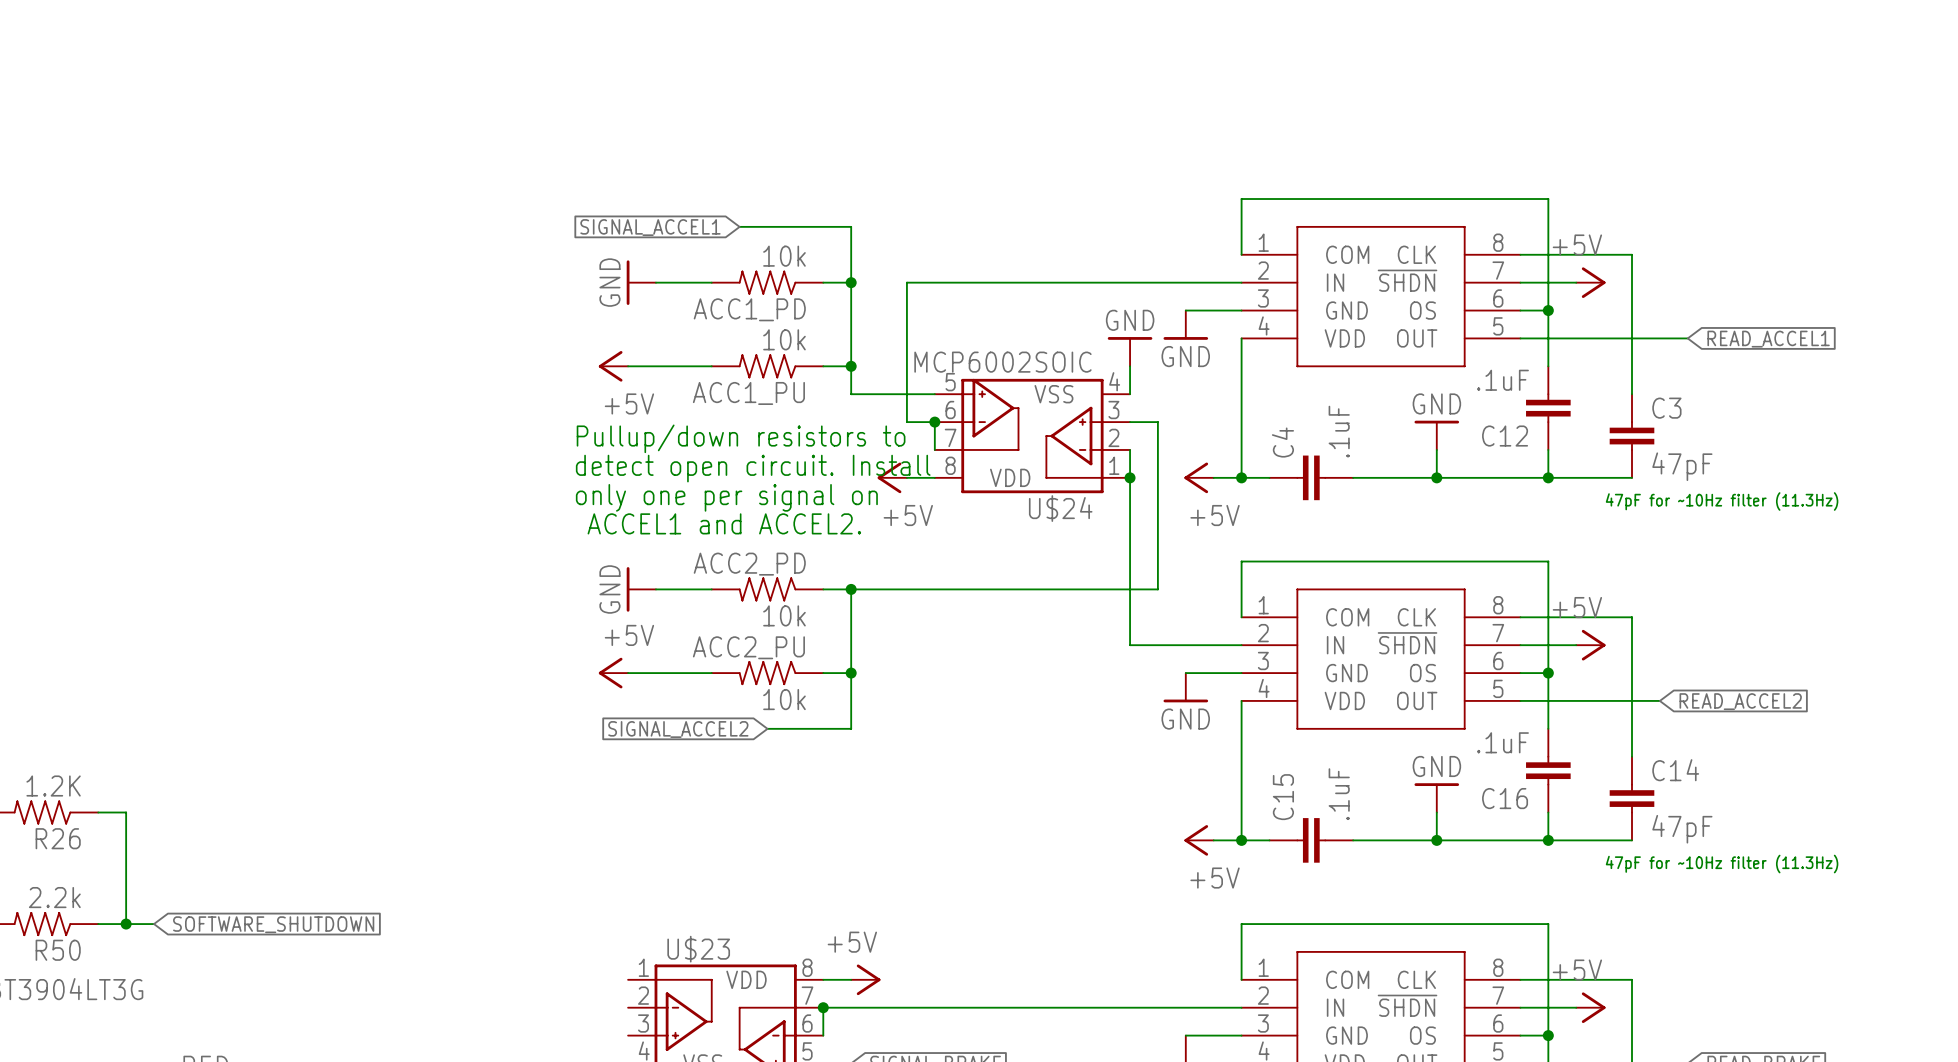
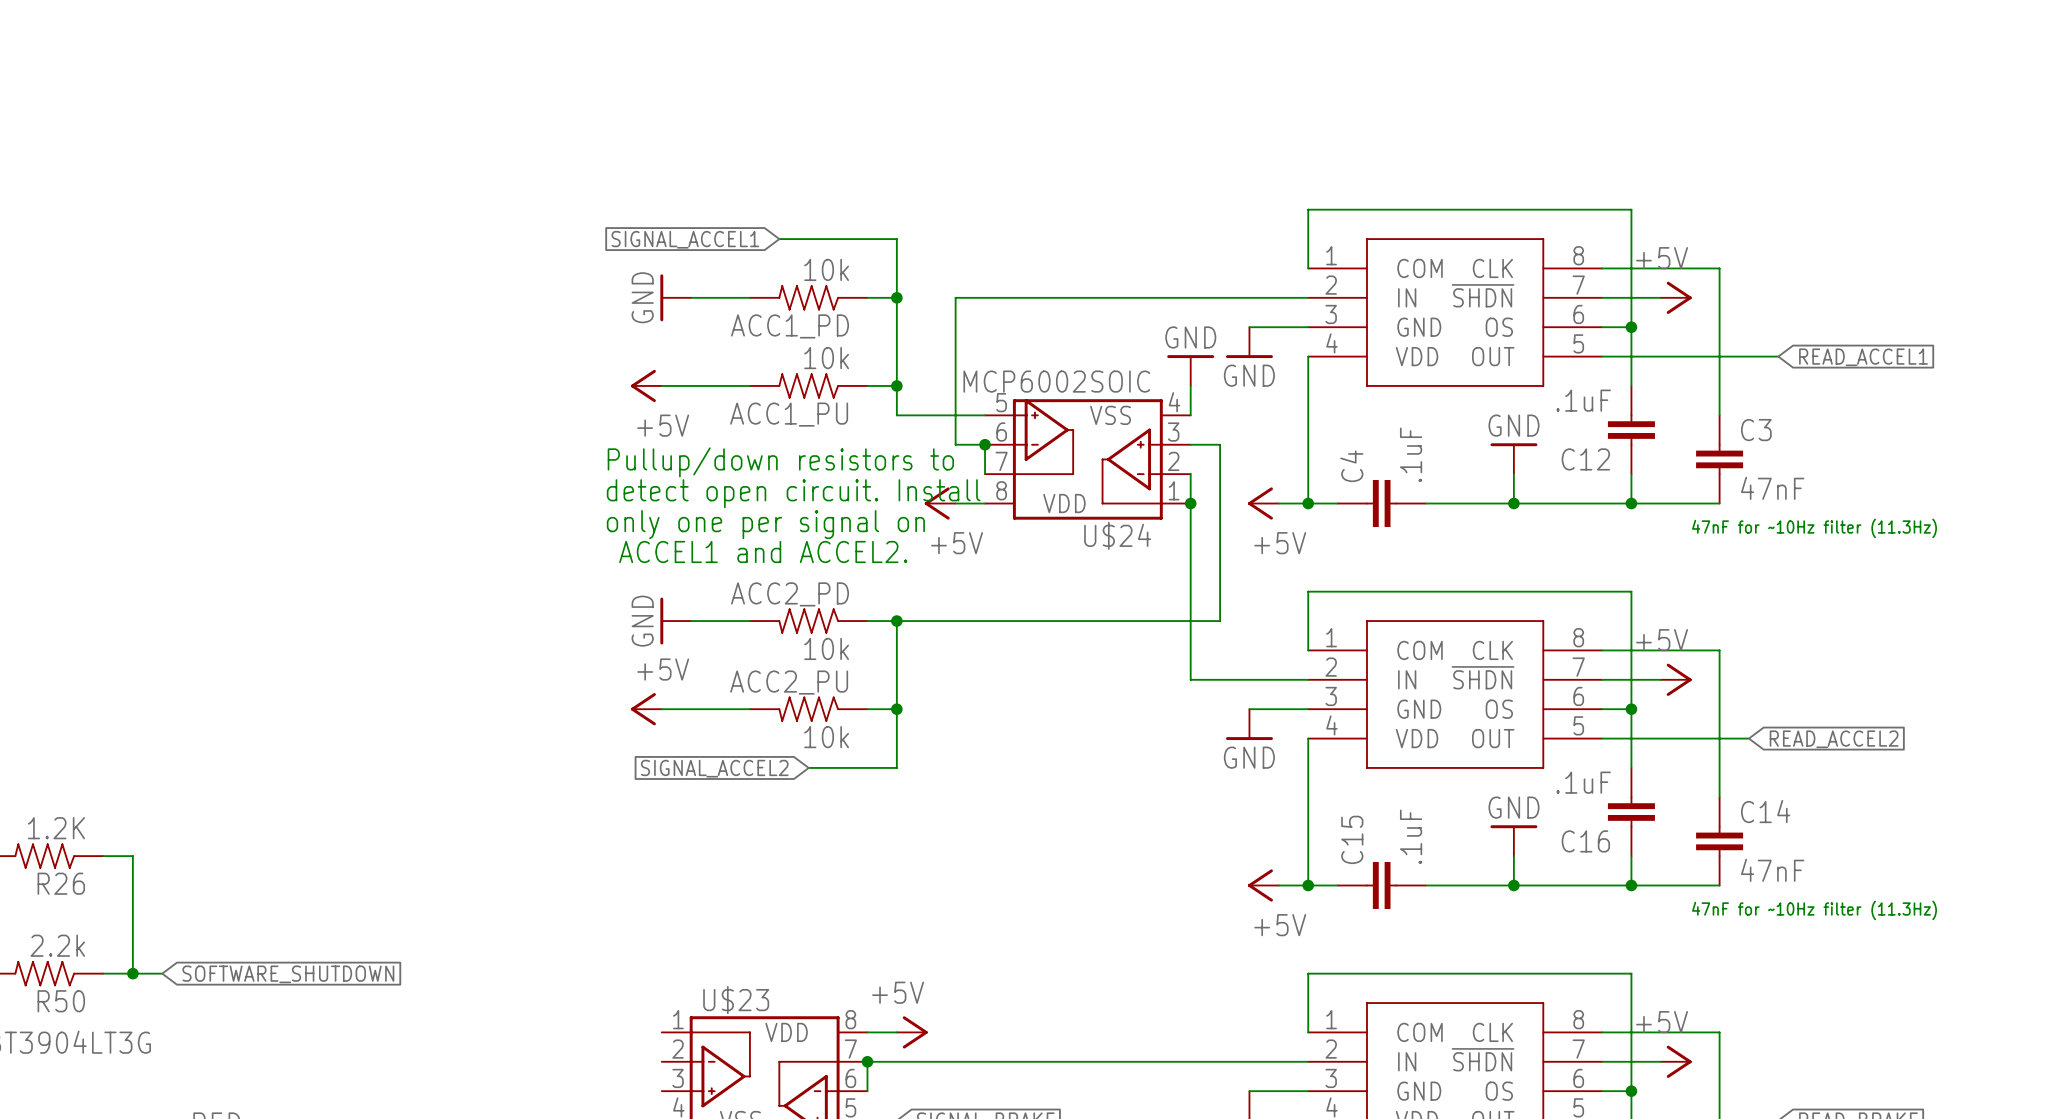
C3 value: 47pF (1682, 466) -> 47nF (1772, 488)
text: 47pF for ~10Hz filter (11.3Hz) (1722, 501) -> 47nF for ~10Hz filter (11.3Hz) (1814, 528)
C14 value: 47pF (1682, 829) -> 47nF (1772, 870)
text: 47pF for ~10Hz filter (11.3Hz) (1722, 864) -> 47nF for ~10Hz filter (11.3Hz) (1814, 910)

